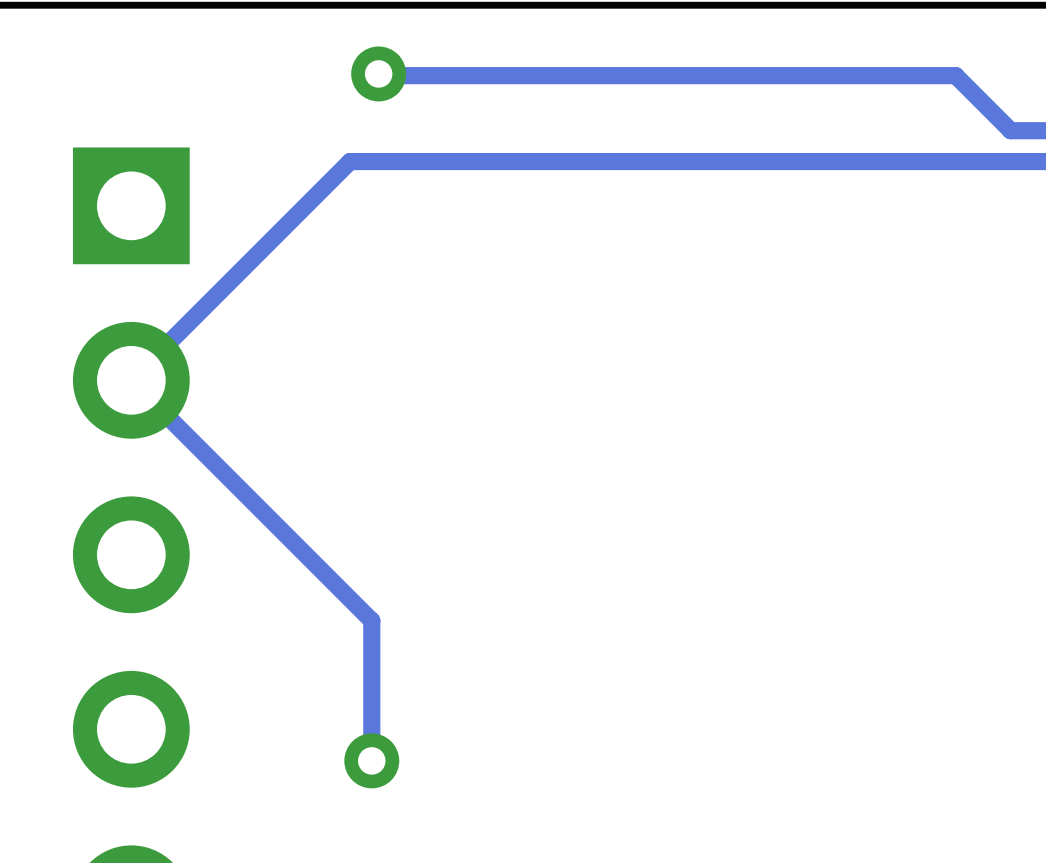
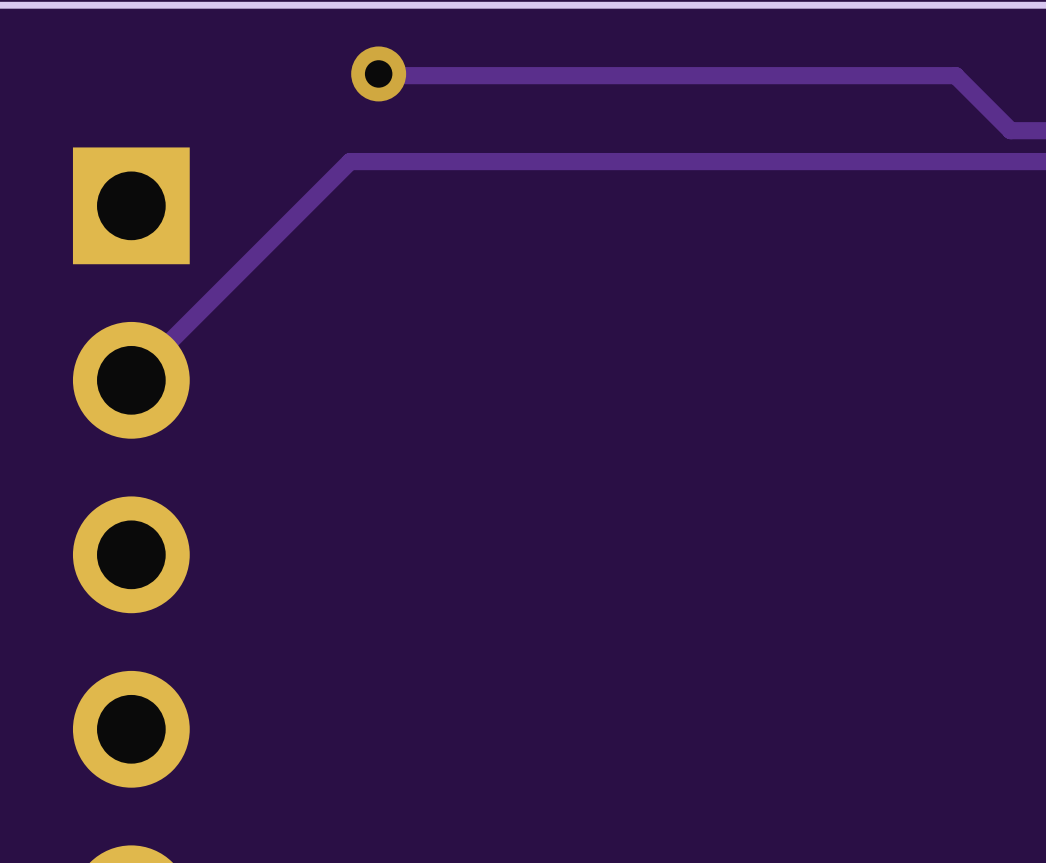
track: (131, 380) (371, 620) (371, 760) -> none
via: (371, 760) -> none

